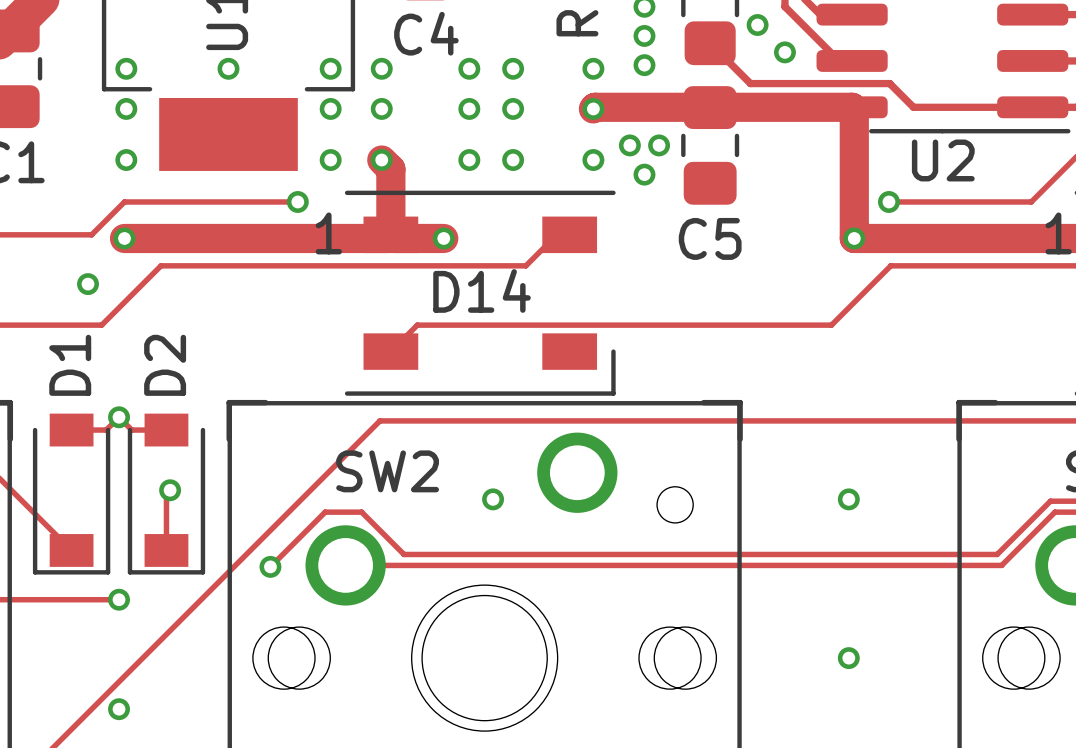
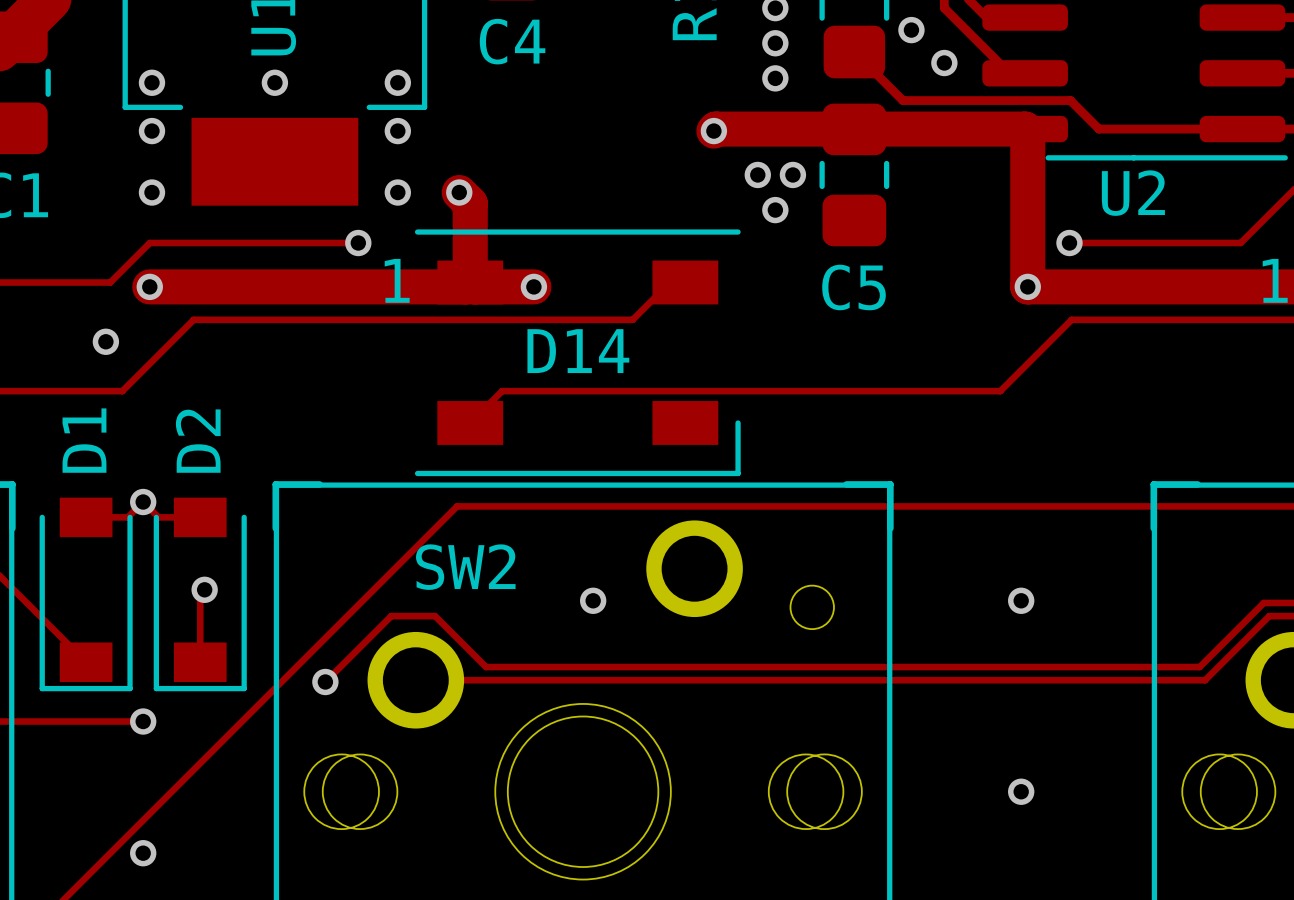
via: (381, 68) -> none
via: (469, 68) -> none
via: (513, 68) -> none
via: (593, 68) -> none
via: (381, 108) -> none
via: (469, 108) -> none
via: (513, 108) -> none
via: (469, 160) -> none
via: (513, 160) -> none
via: (593, 160) -> none

